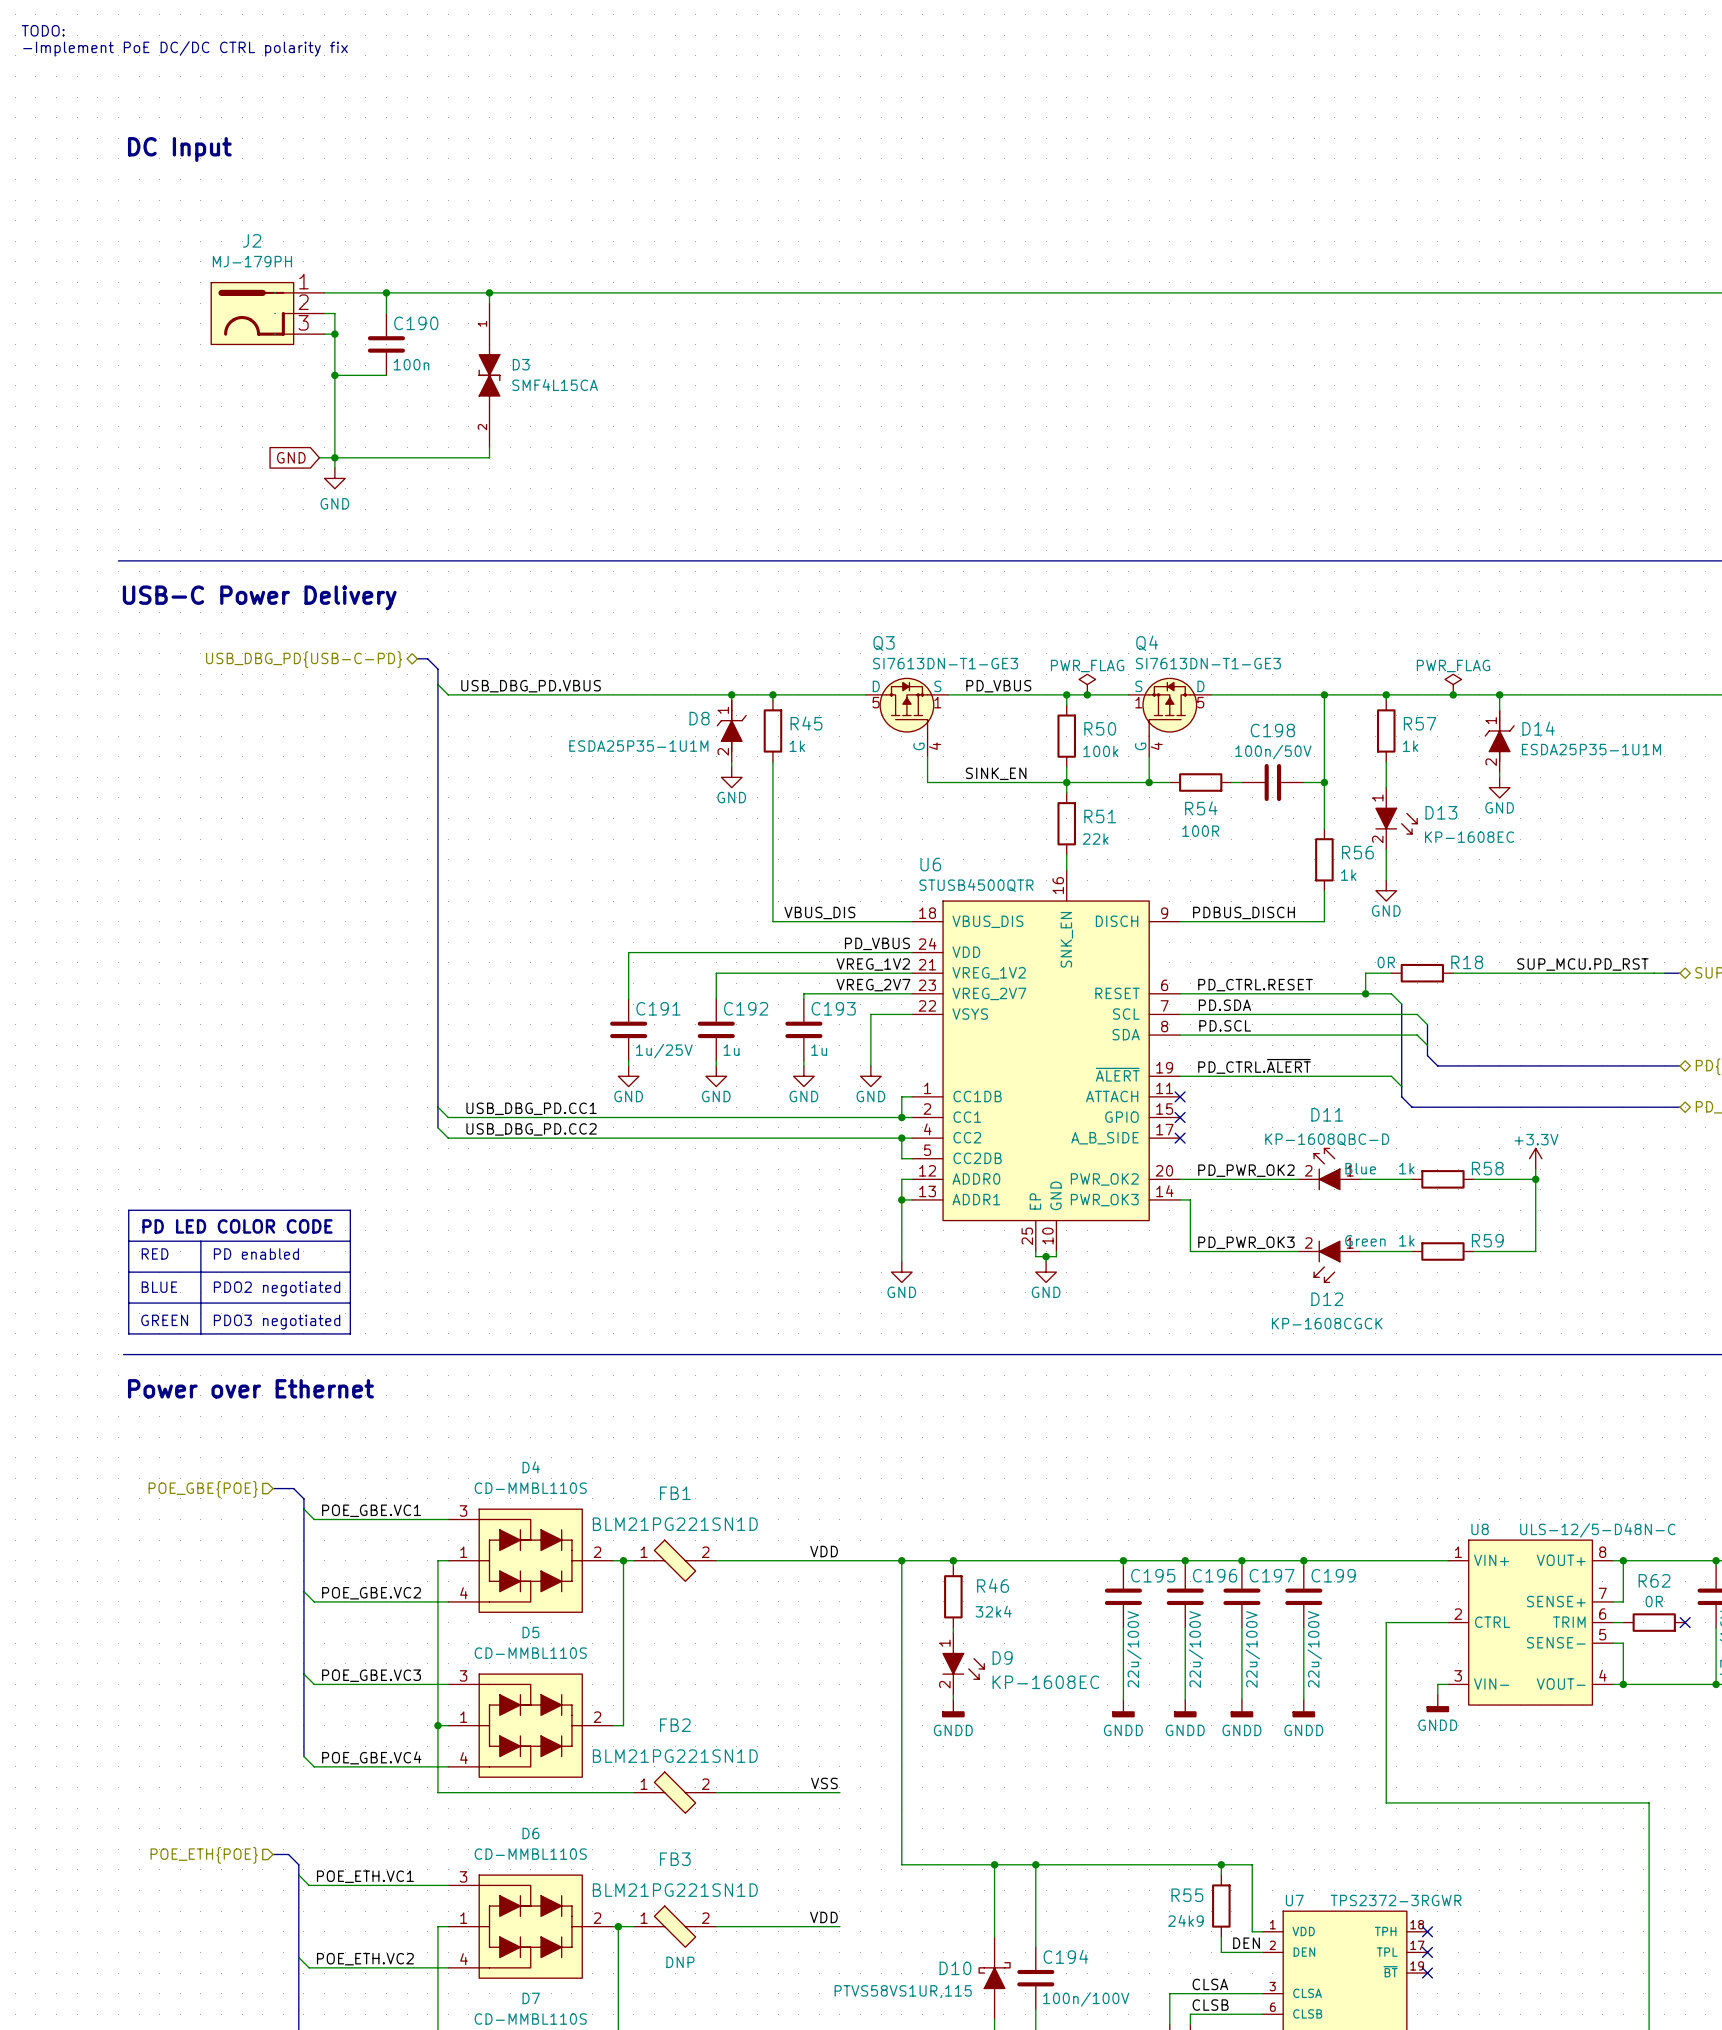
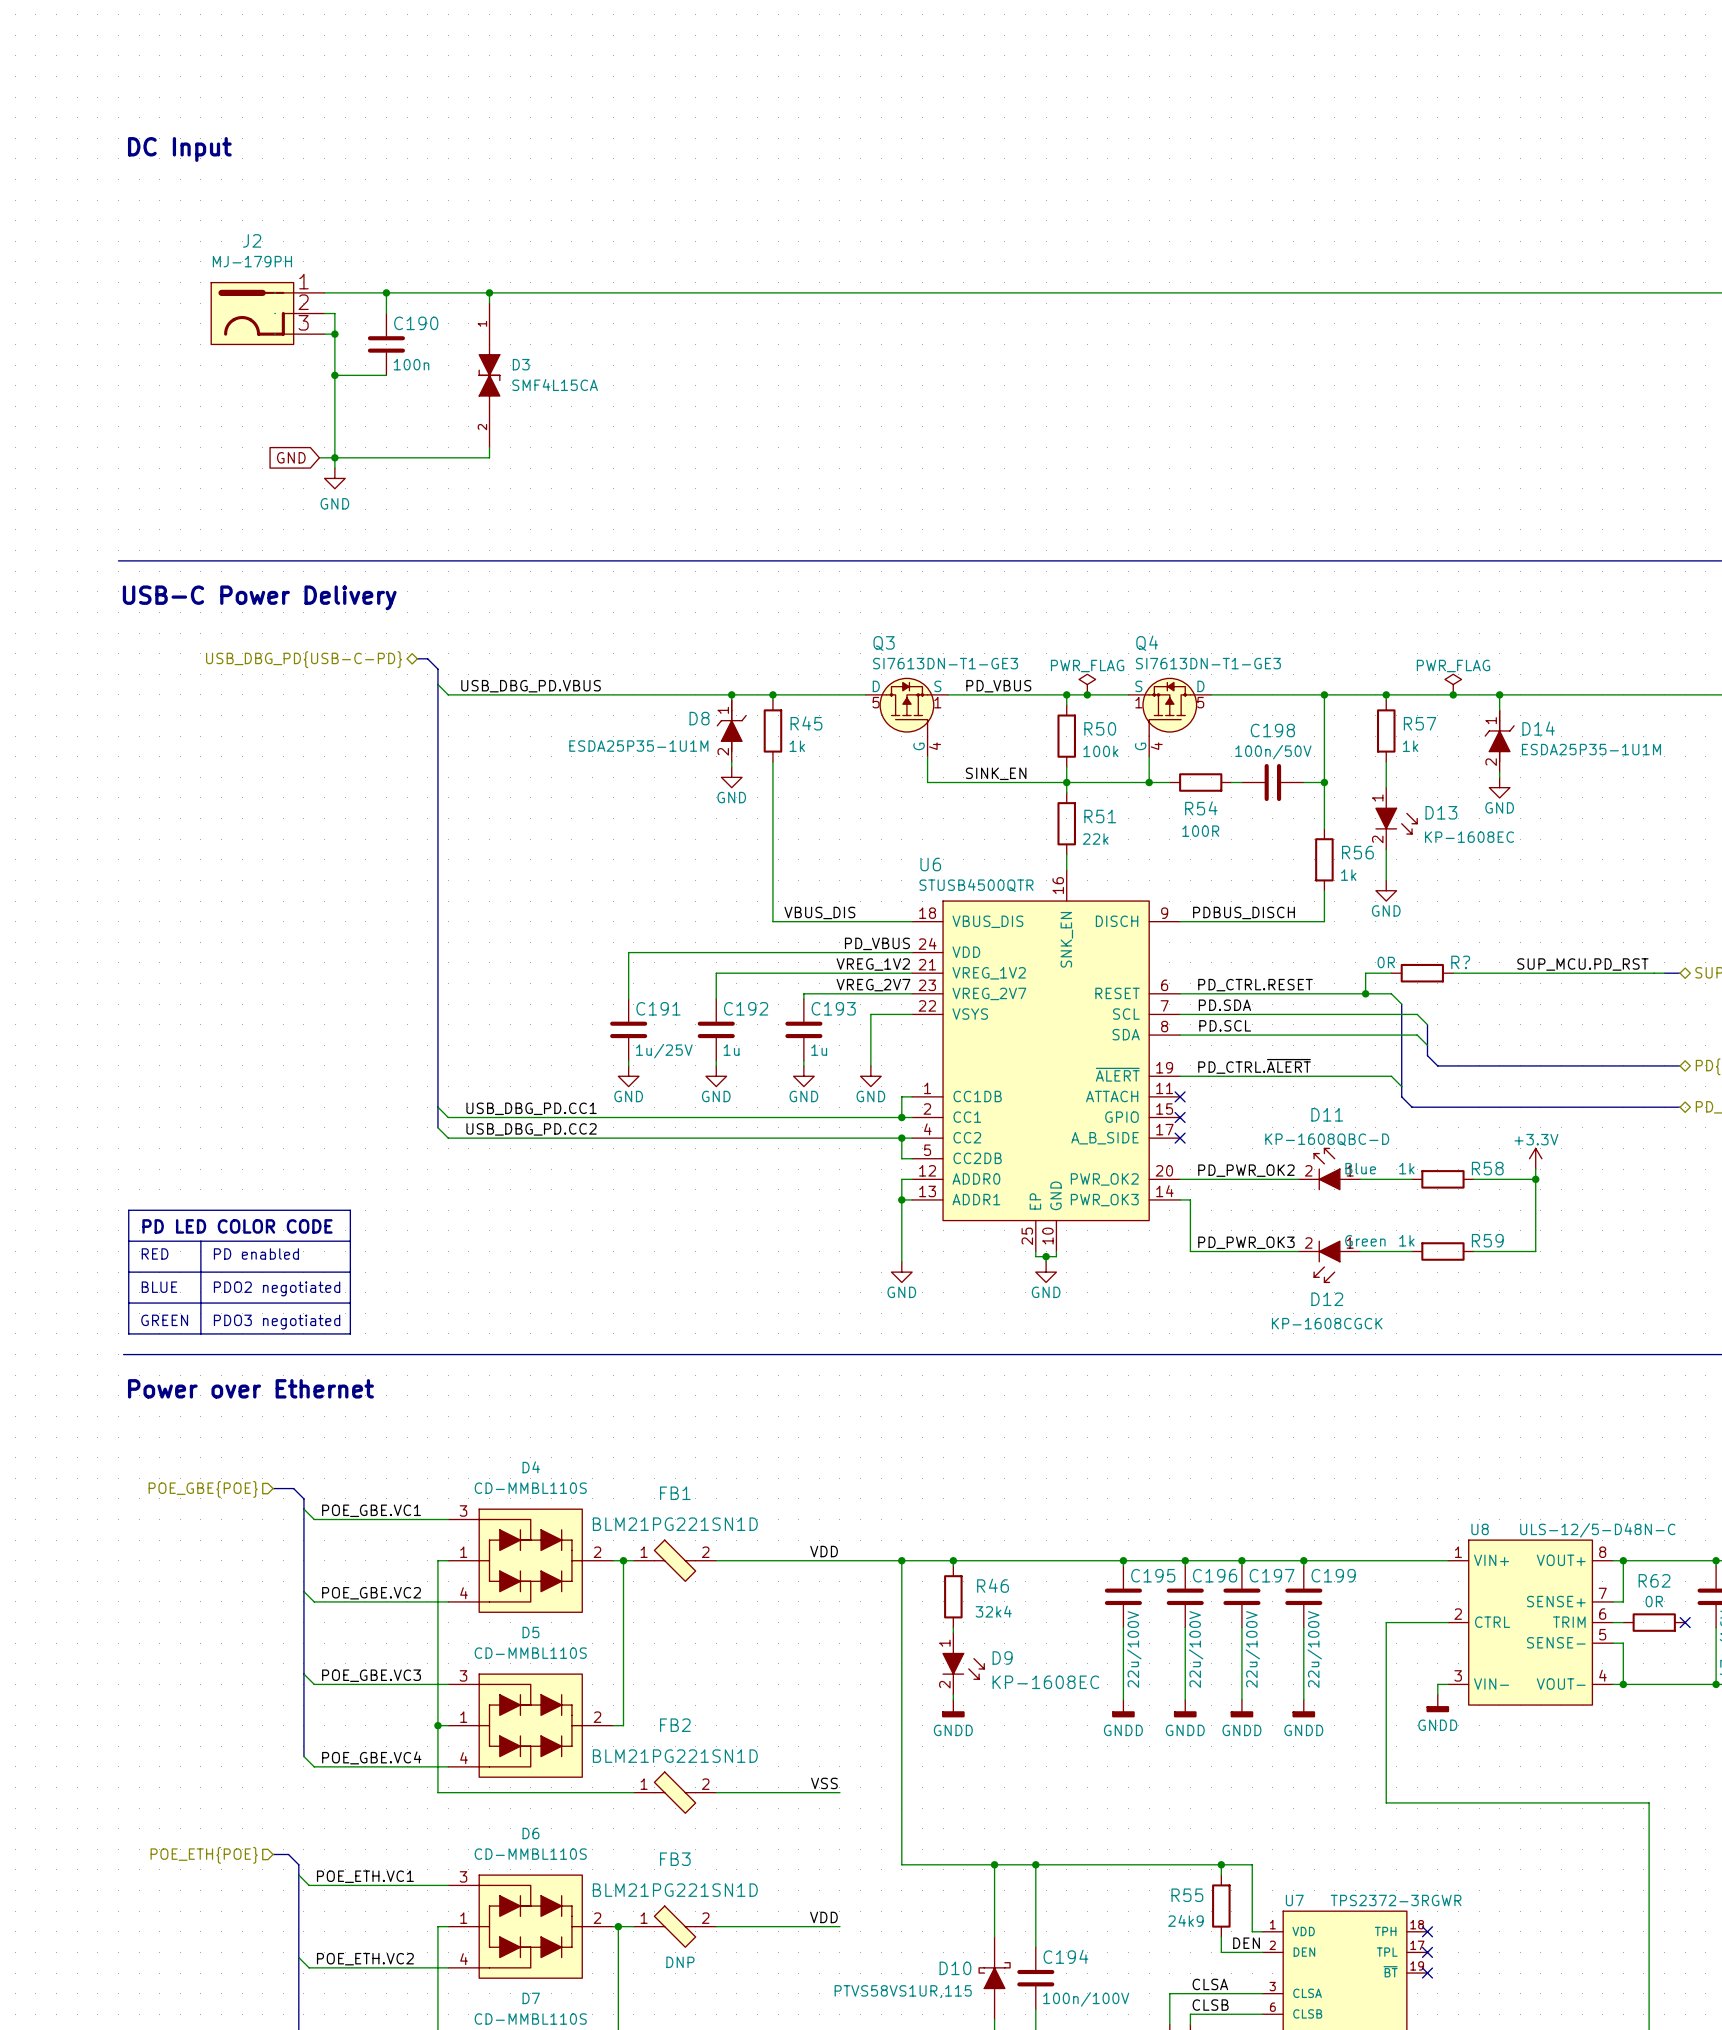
text: TODO: (43, 30) -> none
text: -Implement PoE DC/DC CTRL polarity fix (185, 48) -> none
R18 name: R18 (1467, 962) -> R? (1460, 962)

